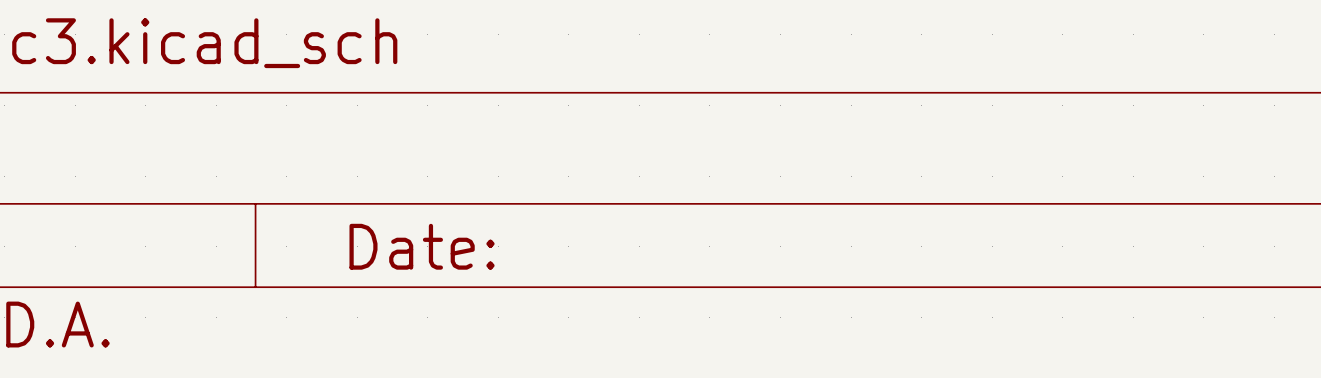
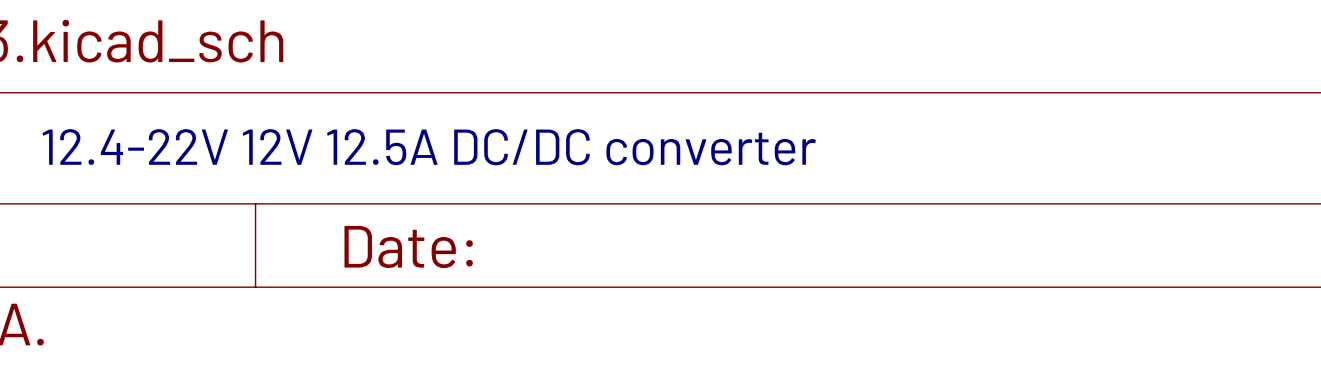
text: none -> 12.4-22V 12V 12.5A DC/DC converter (429, 147)

